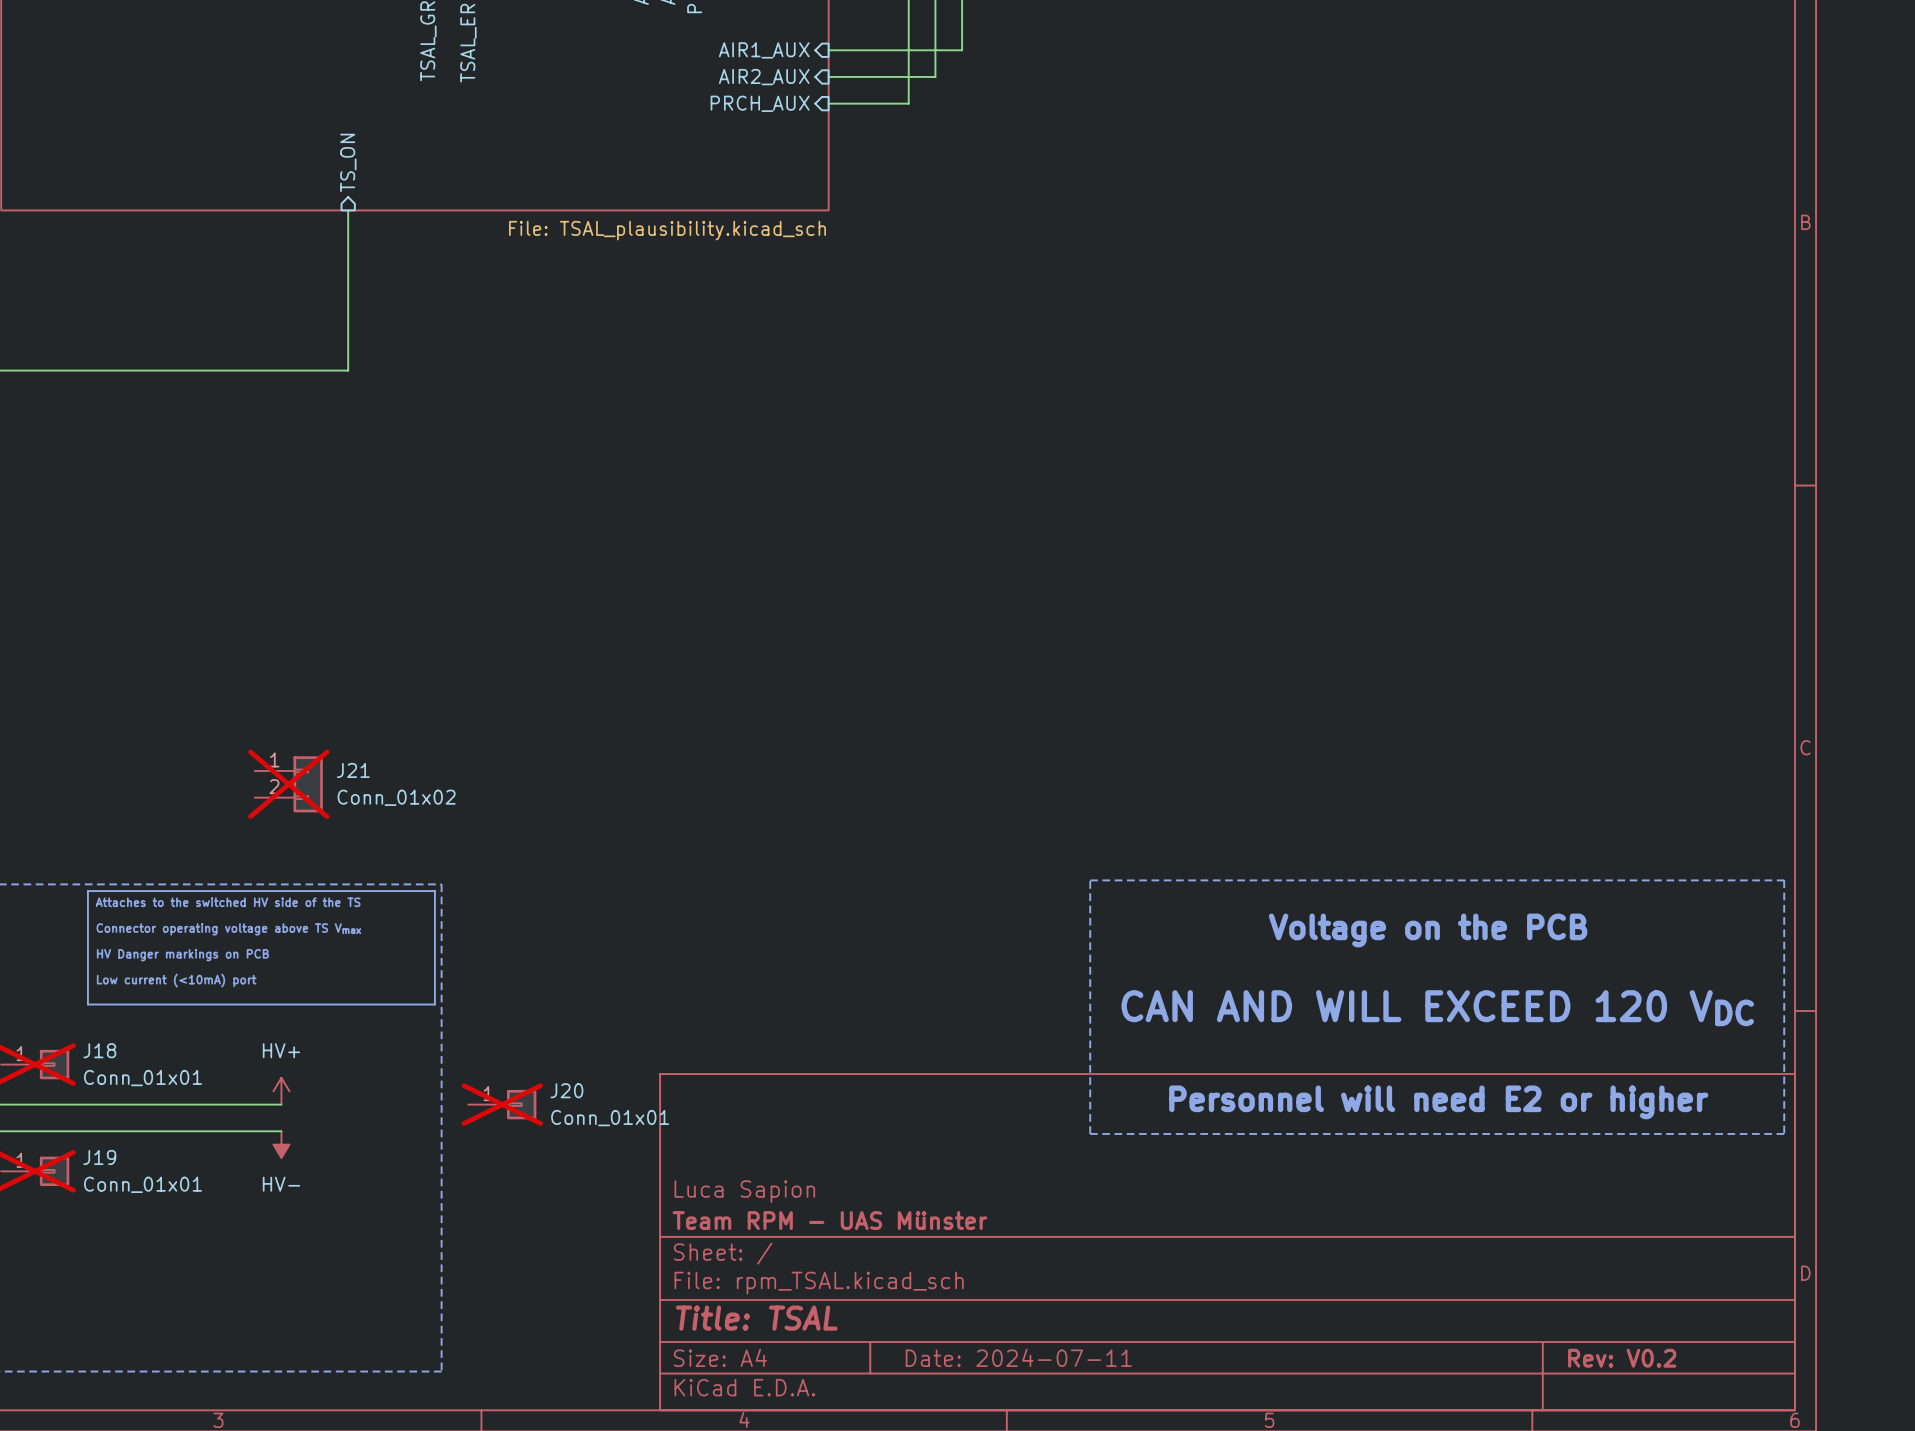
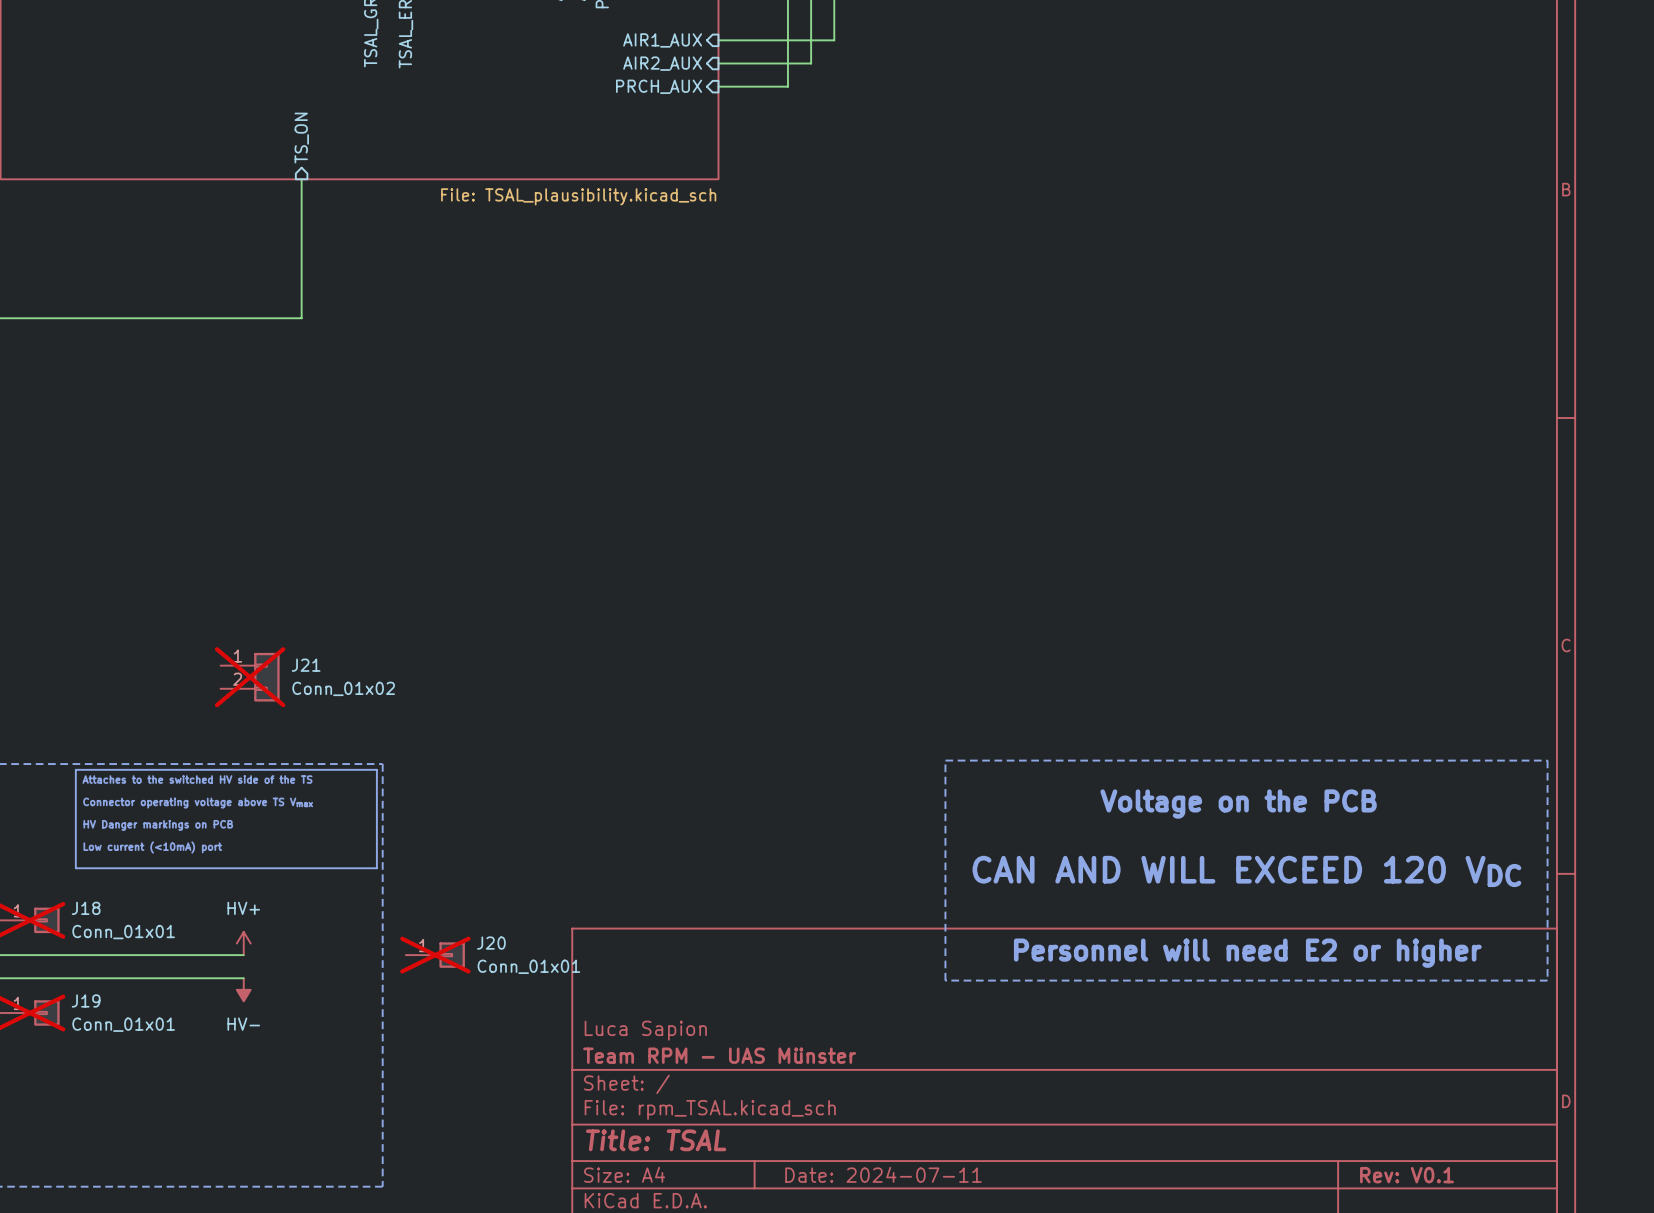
title block: Rev: V0.2 (1622, 1358) -> Rev: V0.1 (1406, 1175)

